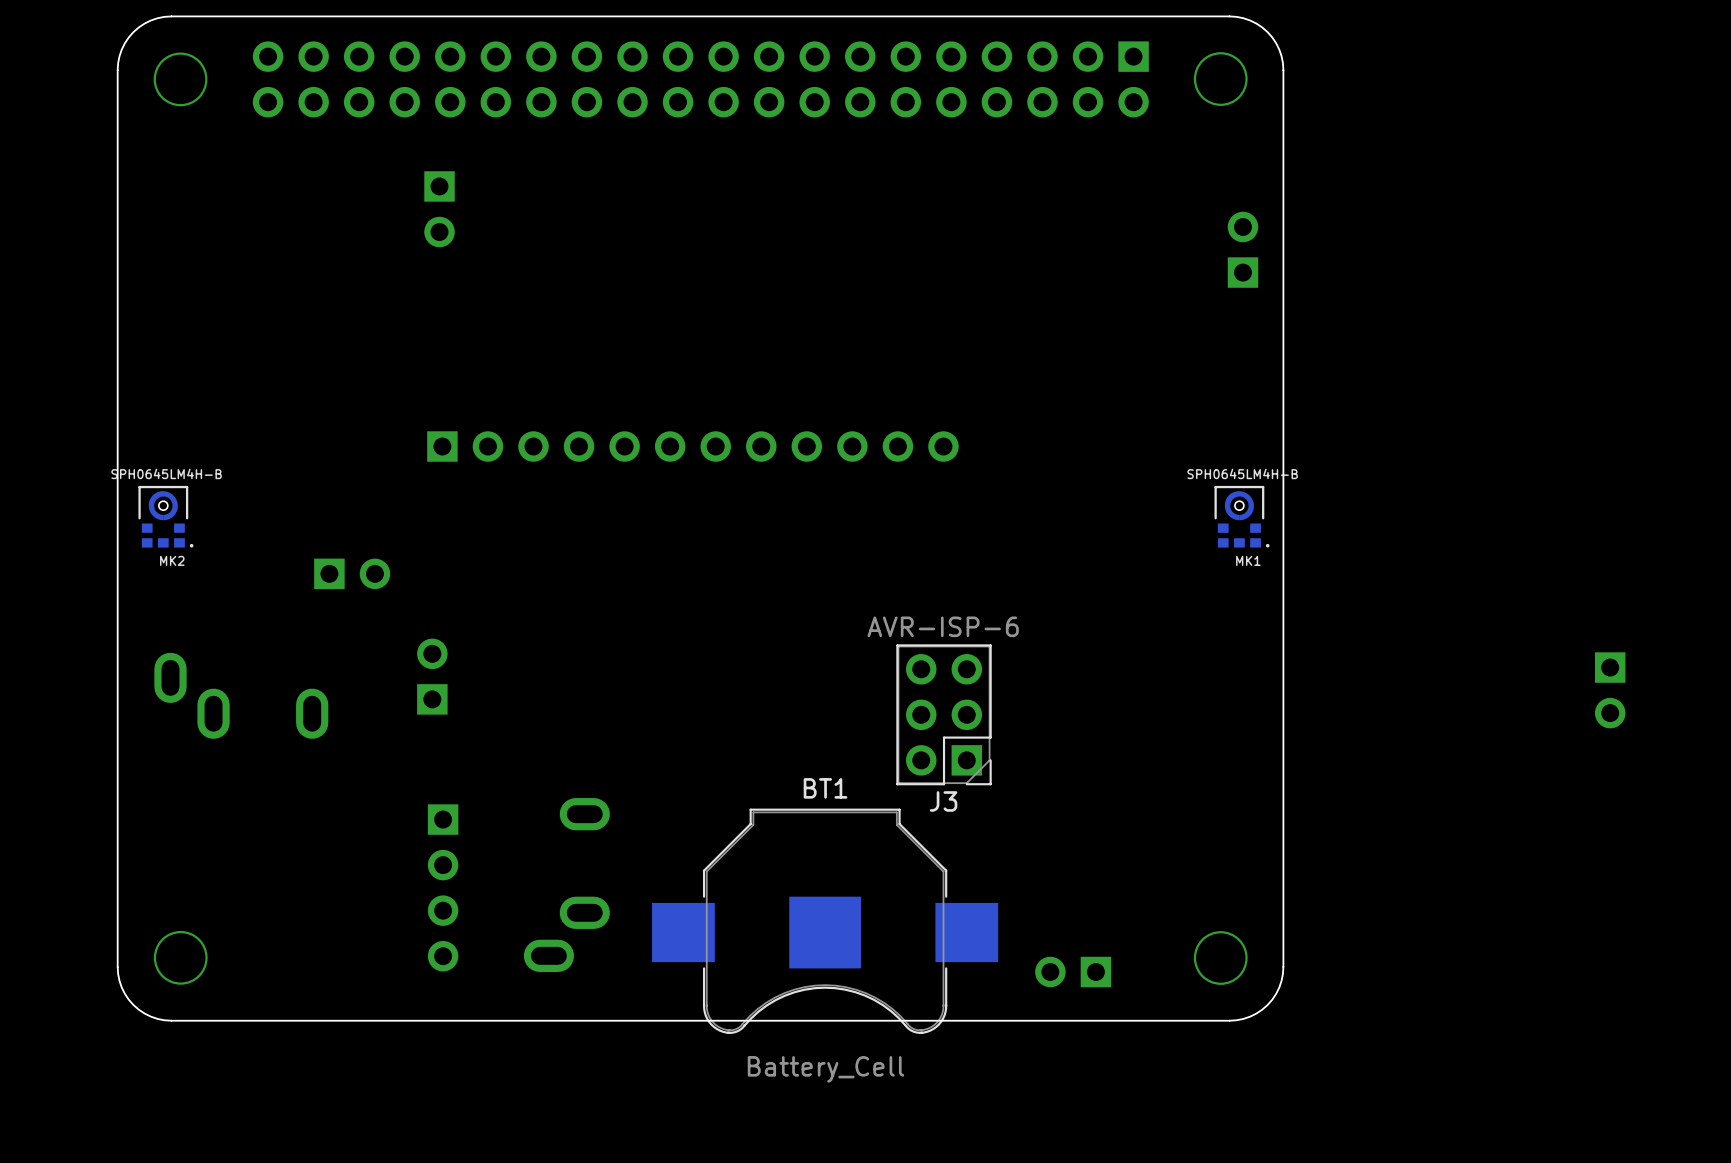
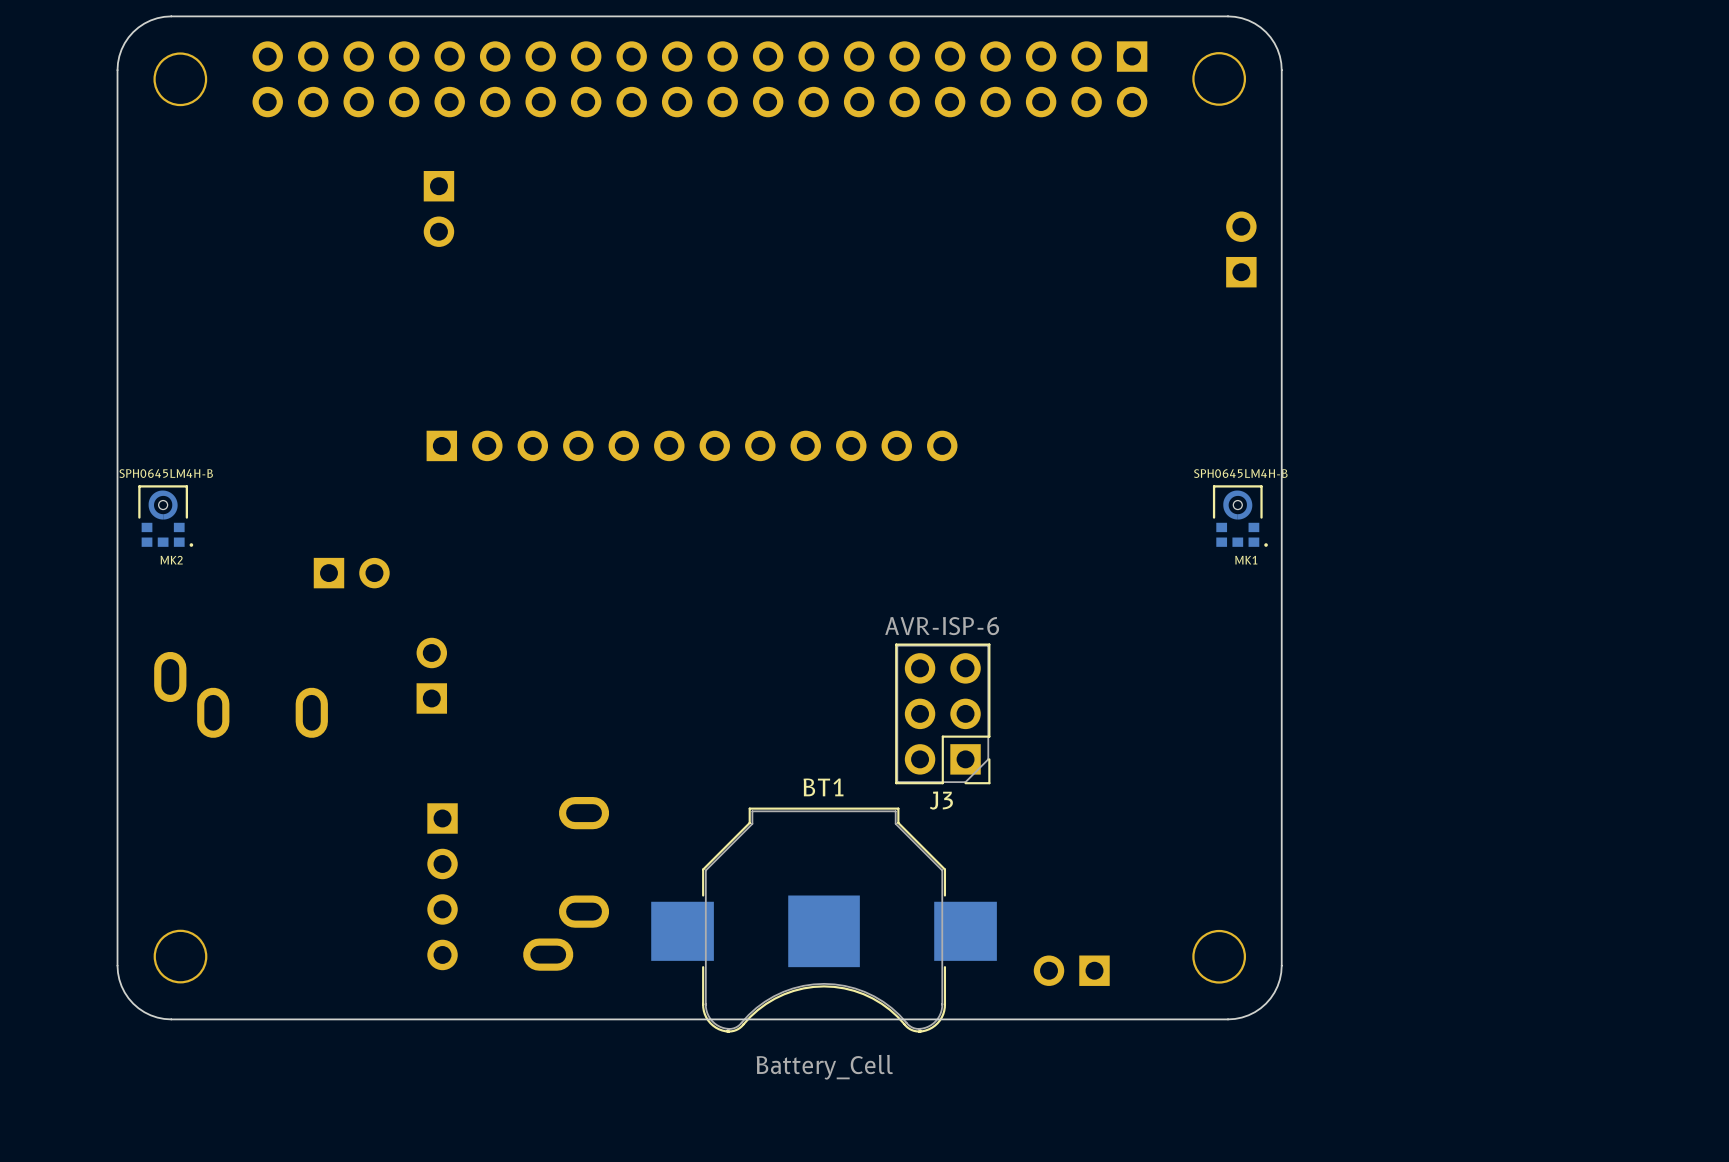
part: (1610, 690) -> none

